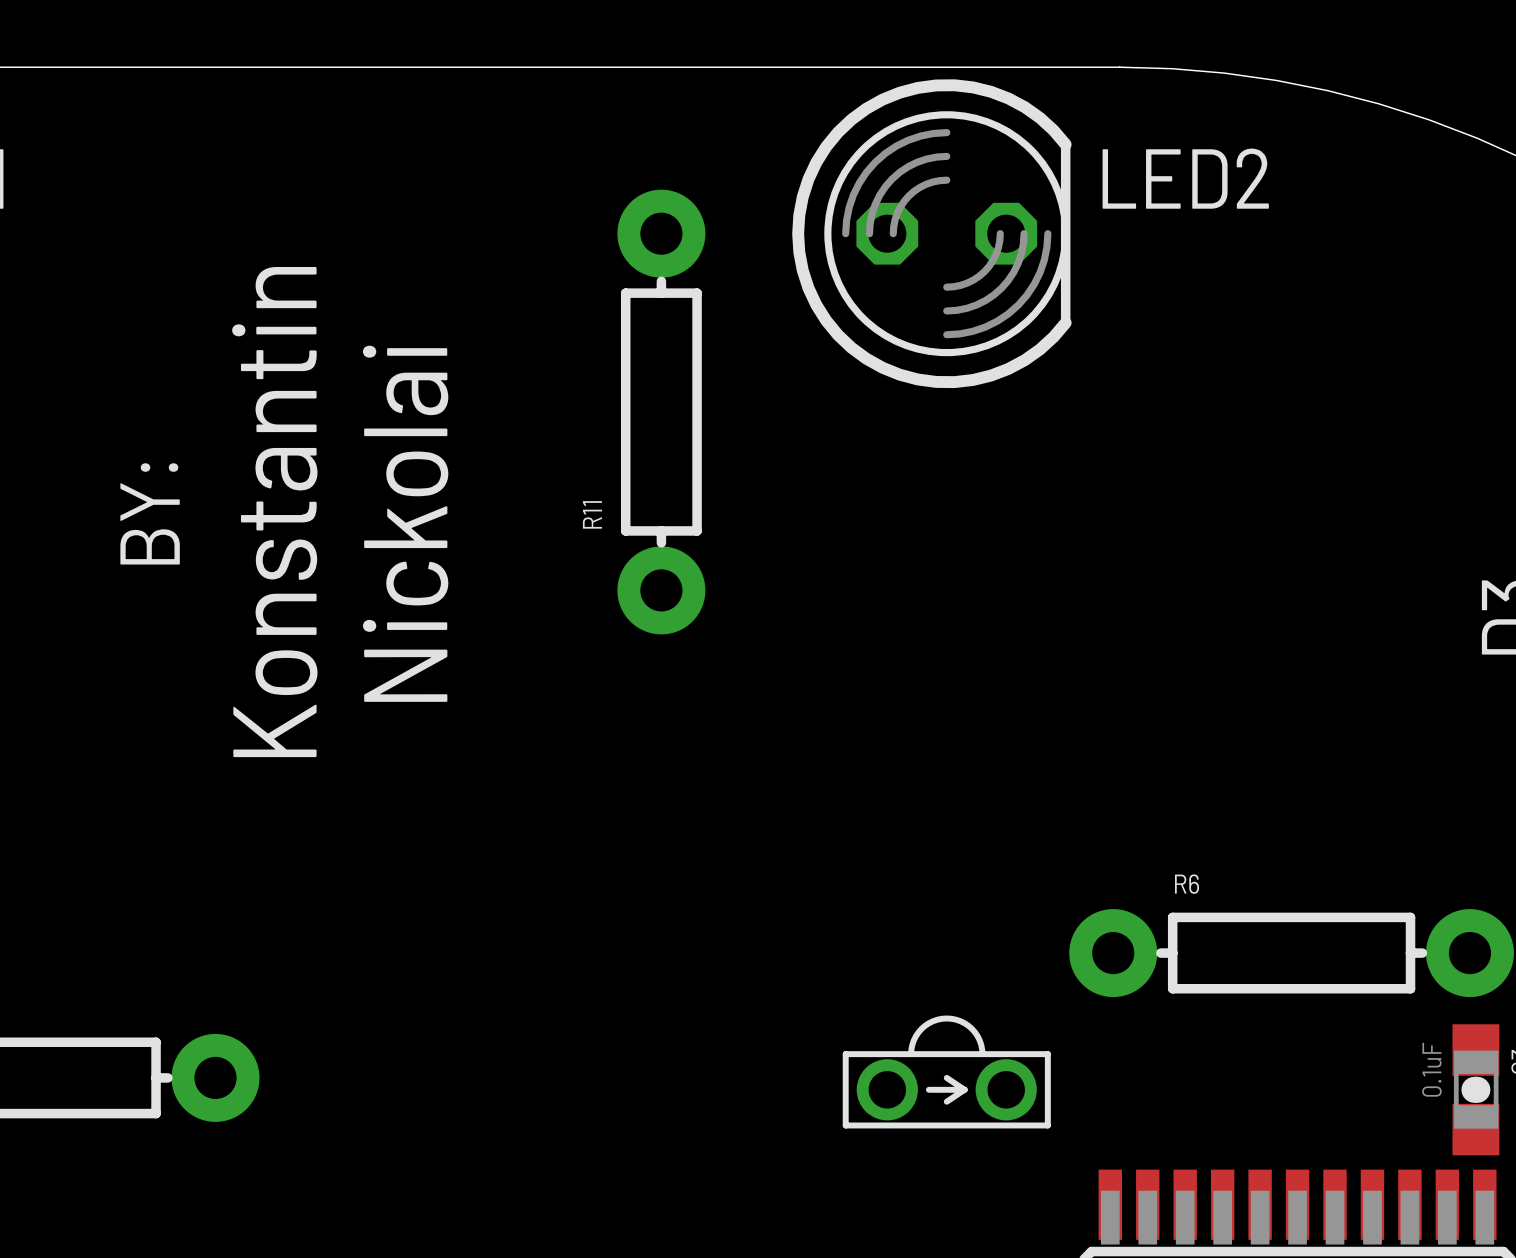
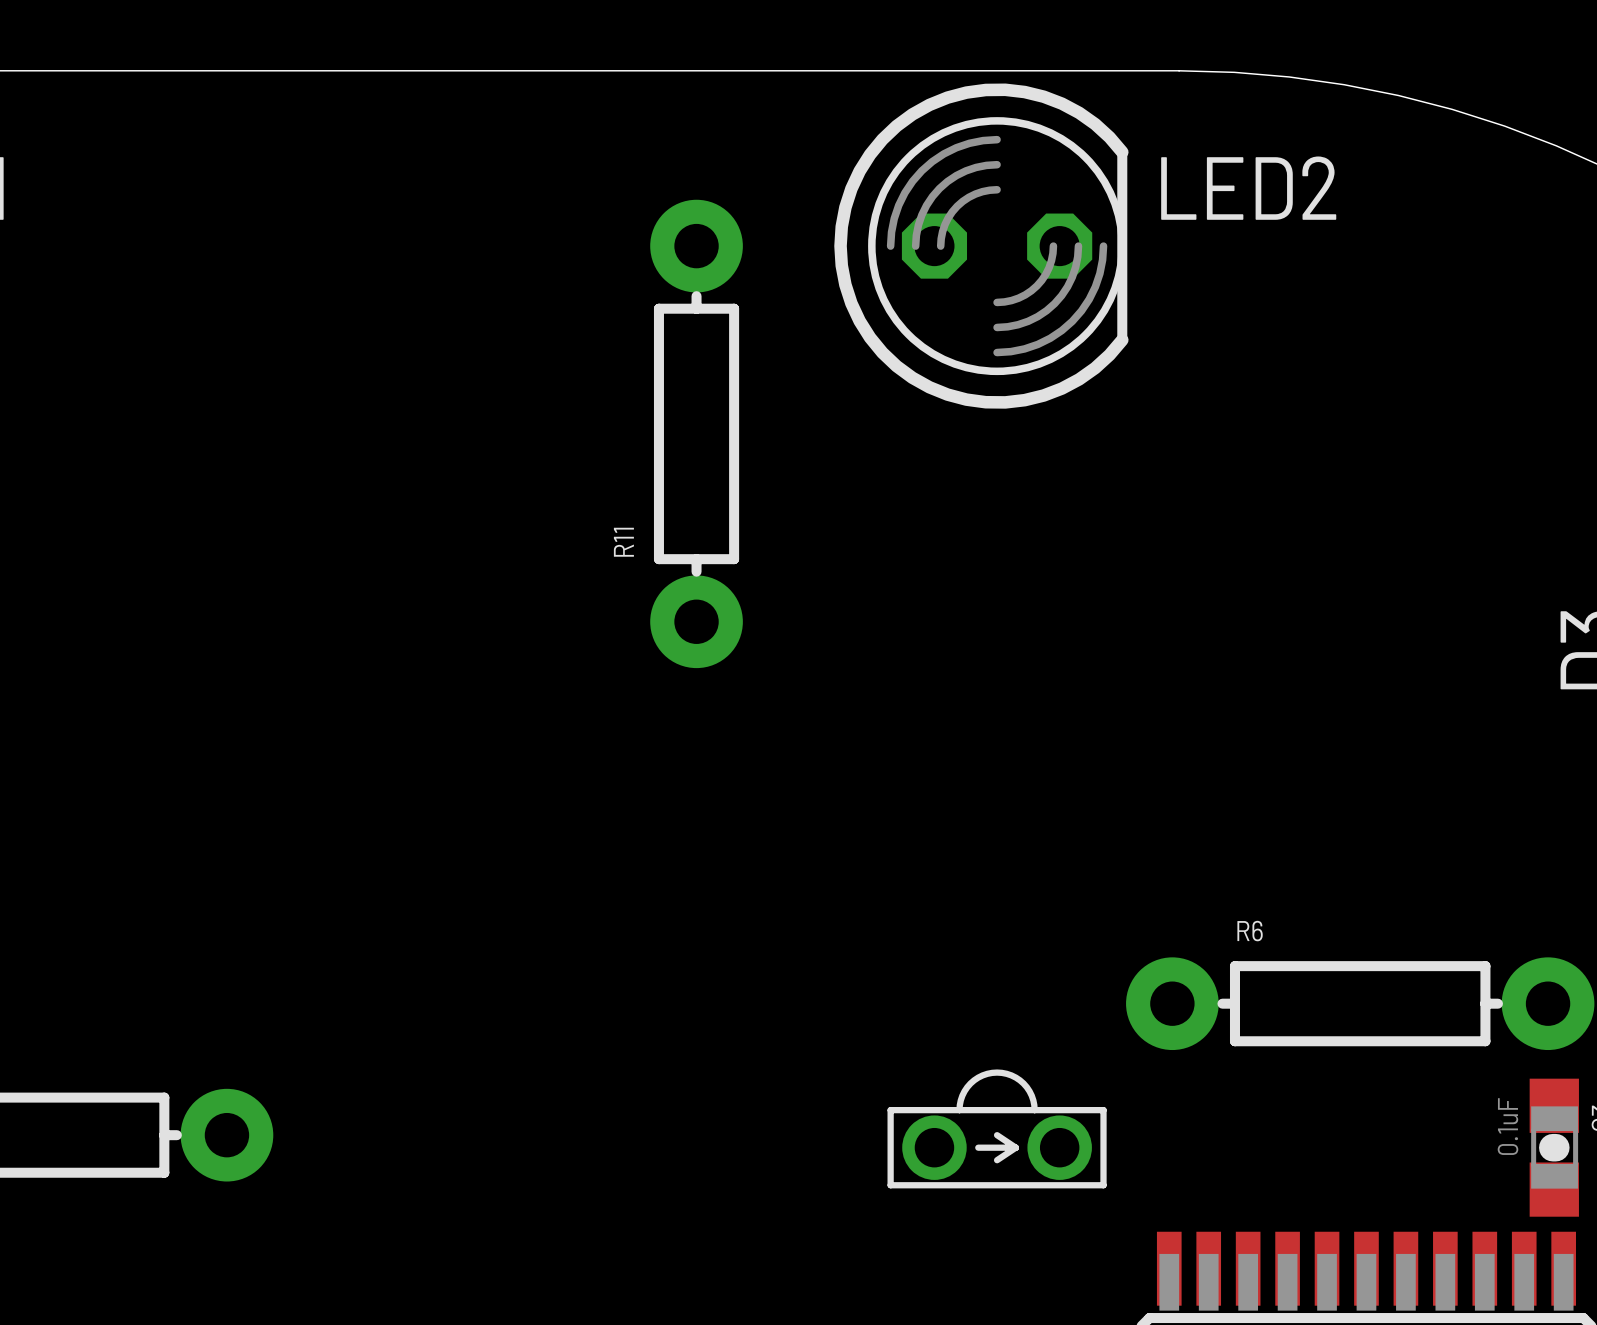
text: Konstantin (274, 512) -> none
text: BY: (150, 513) -> none
text: Nickolai (405, 523) -> none

